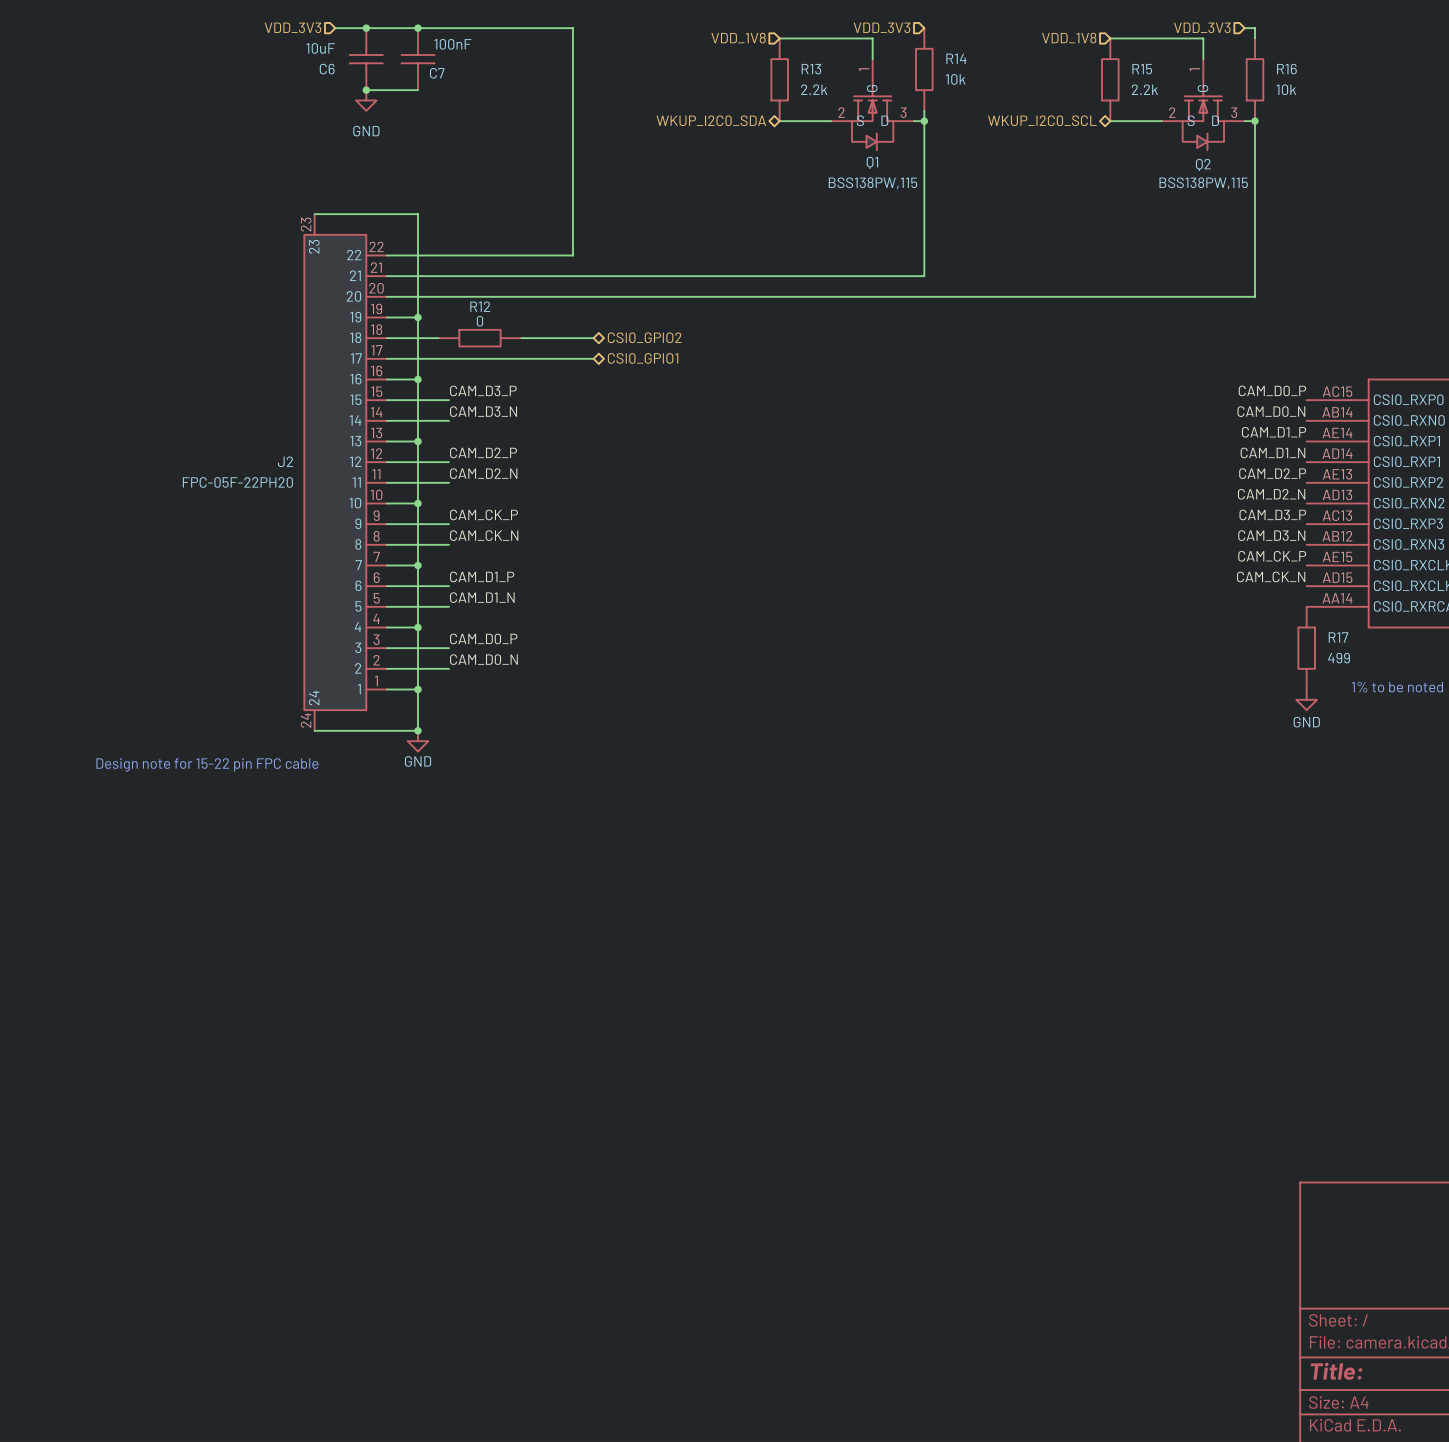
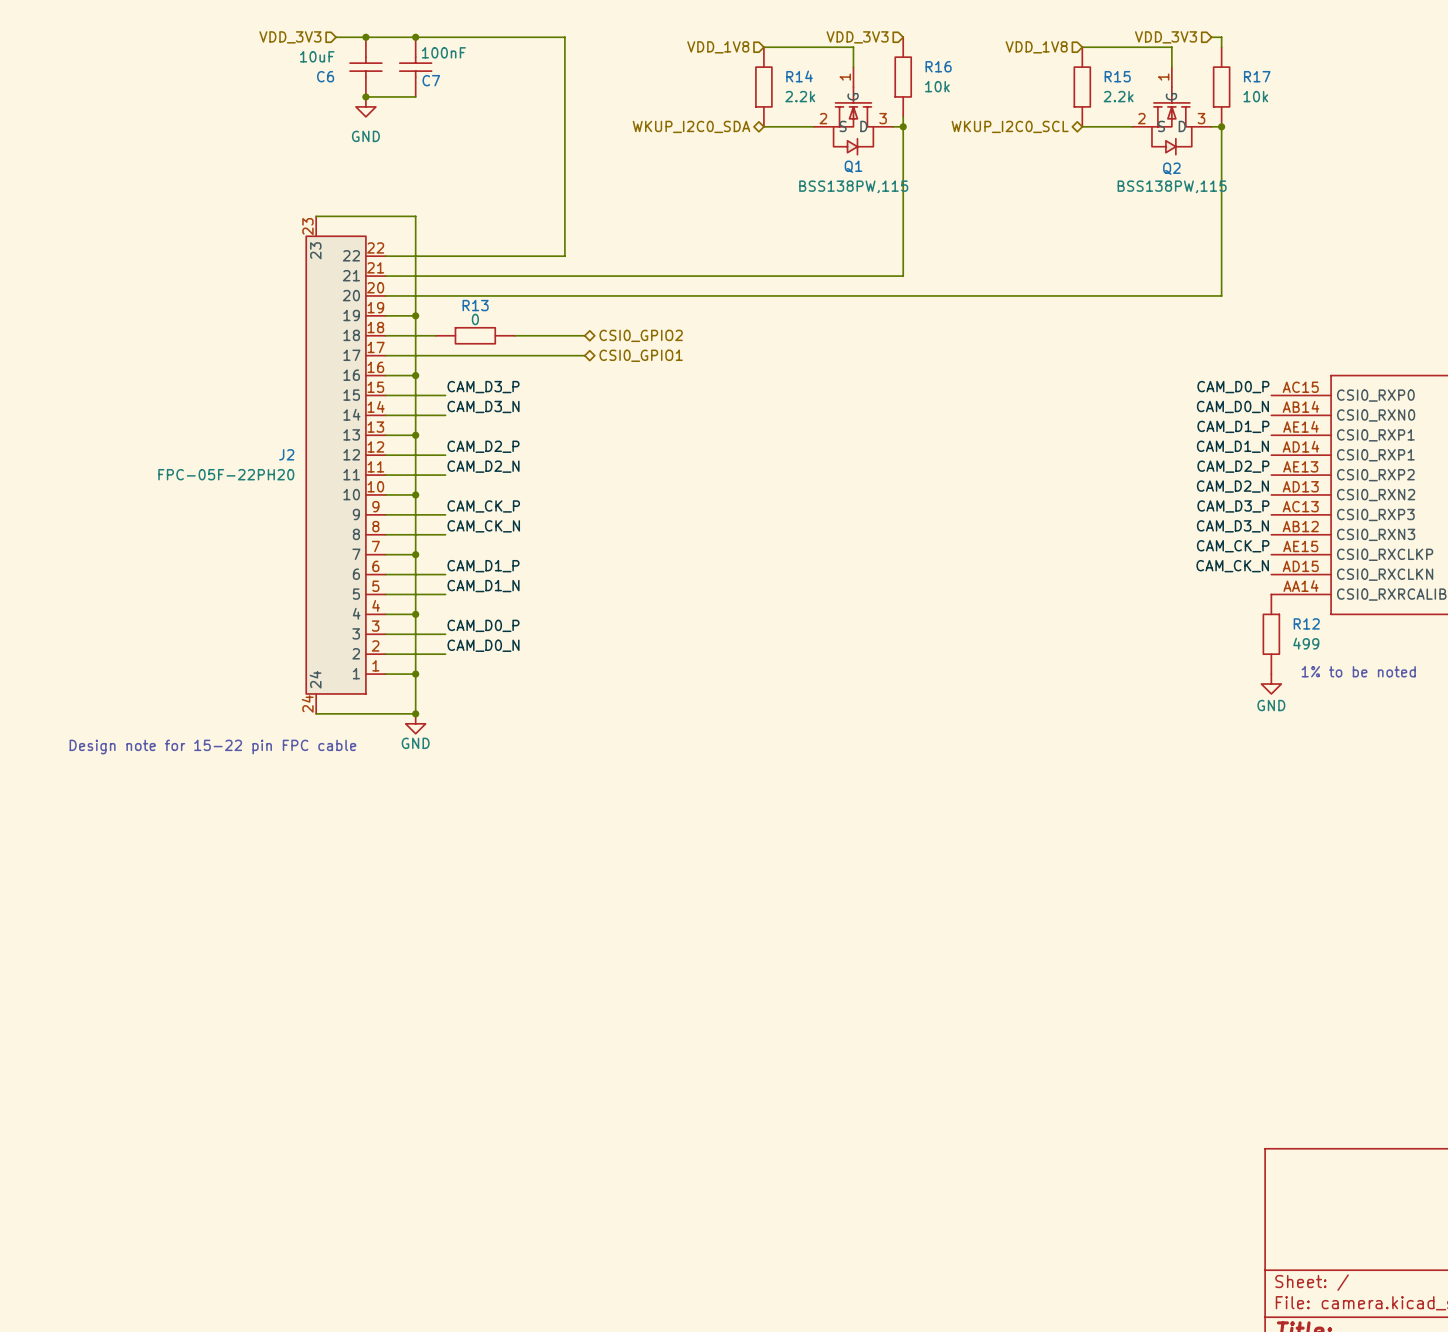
R14 name: R14 (956, 58) -> R16 (938, 66)
R13 name: R13 (811, 69) -> R14 (799, 76)
R16 name: R16 (1286, 69) -> R17 (1257, 76)
R12 name: R12 (480, 306) -> R13 (475, 305)
R17 name: R17 (1338, 637) -> R12 (1306, 623)

